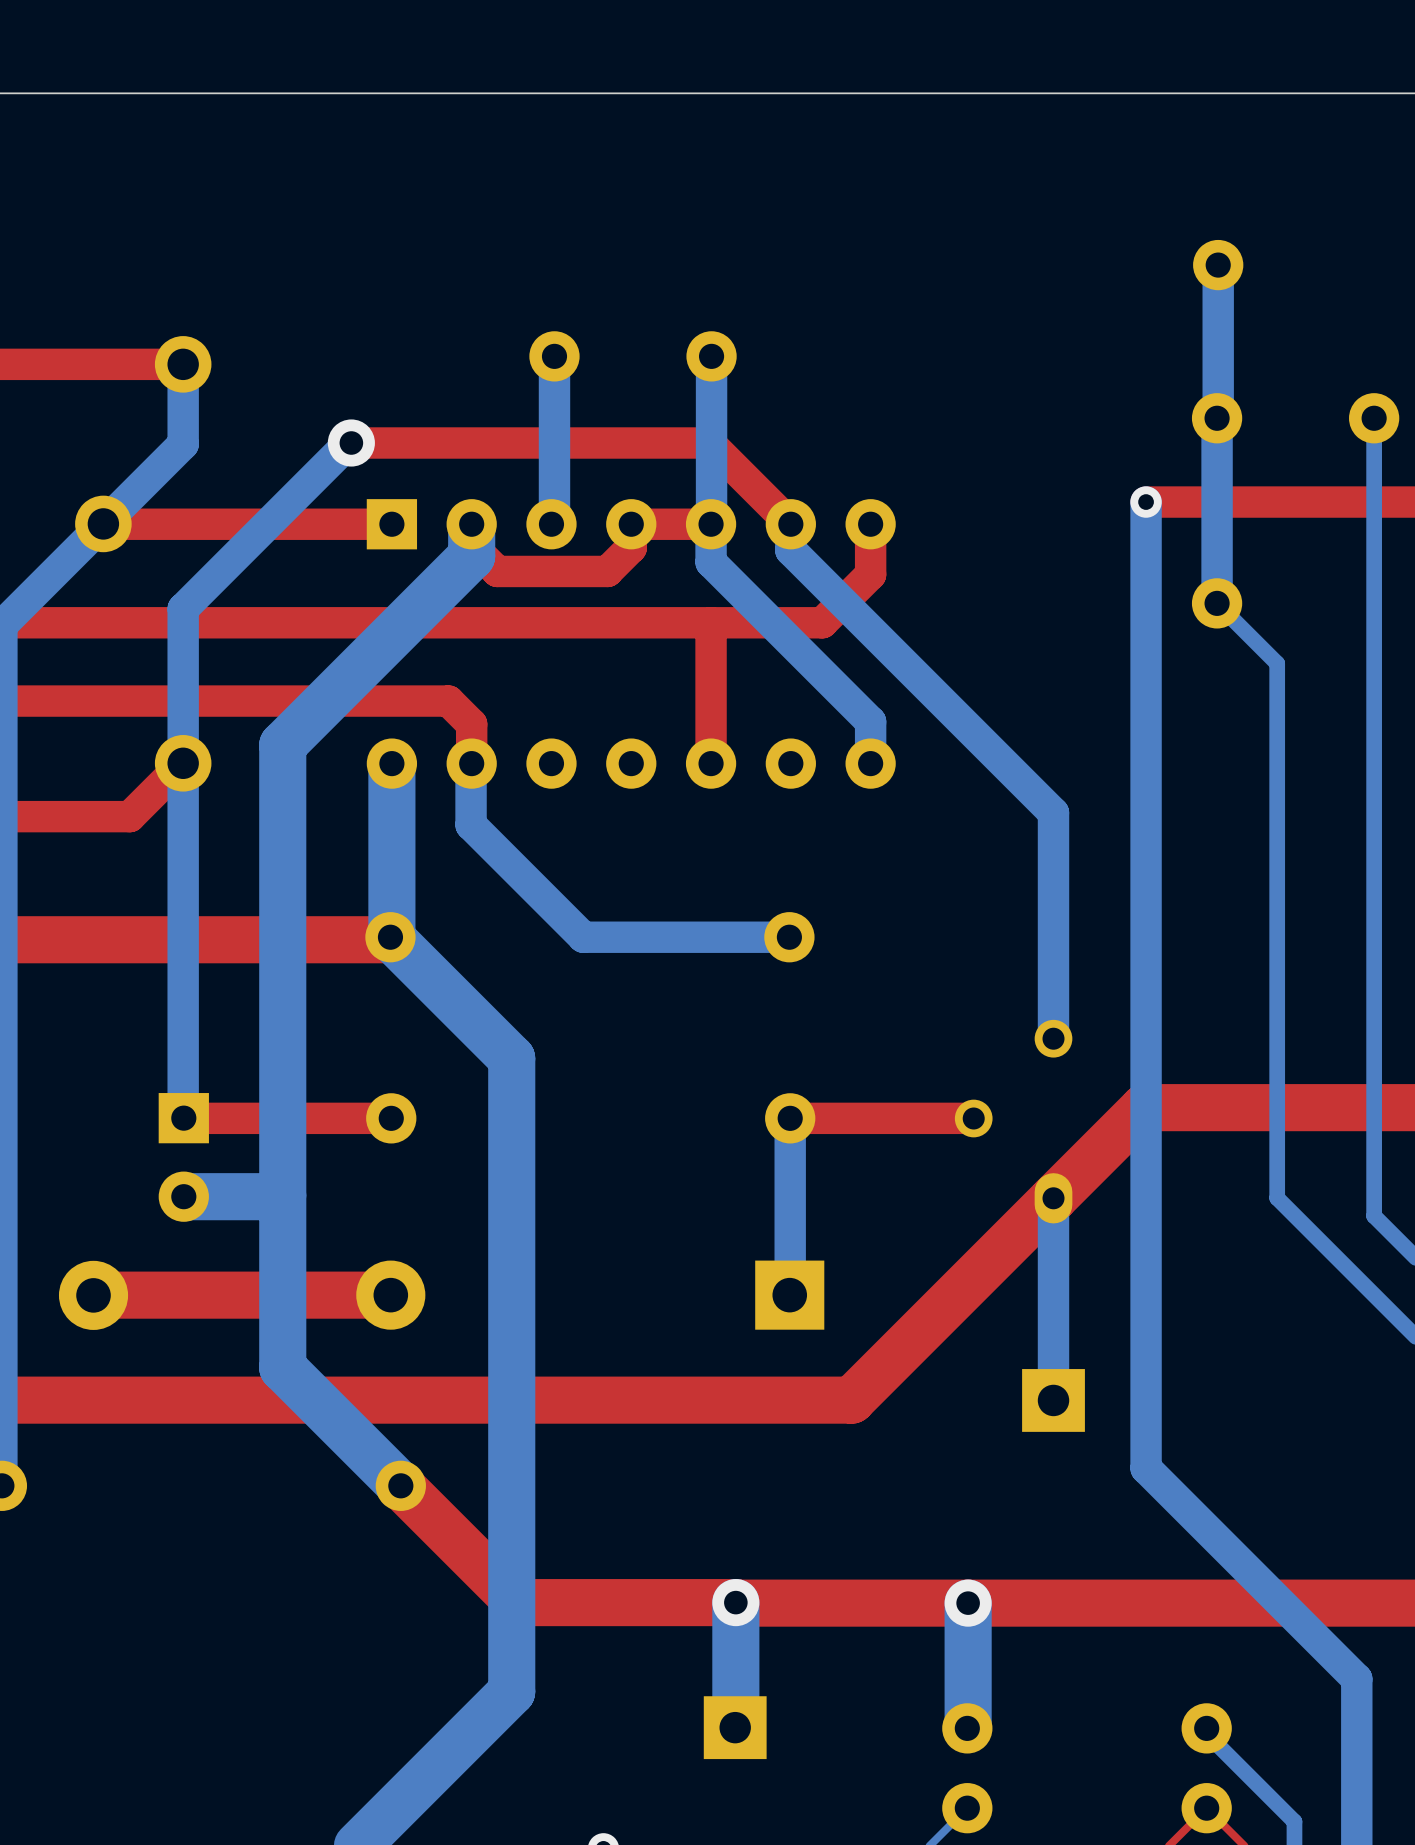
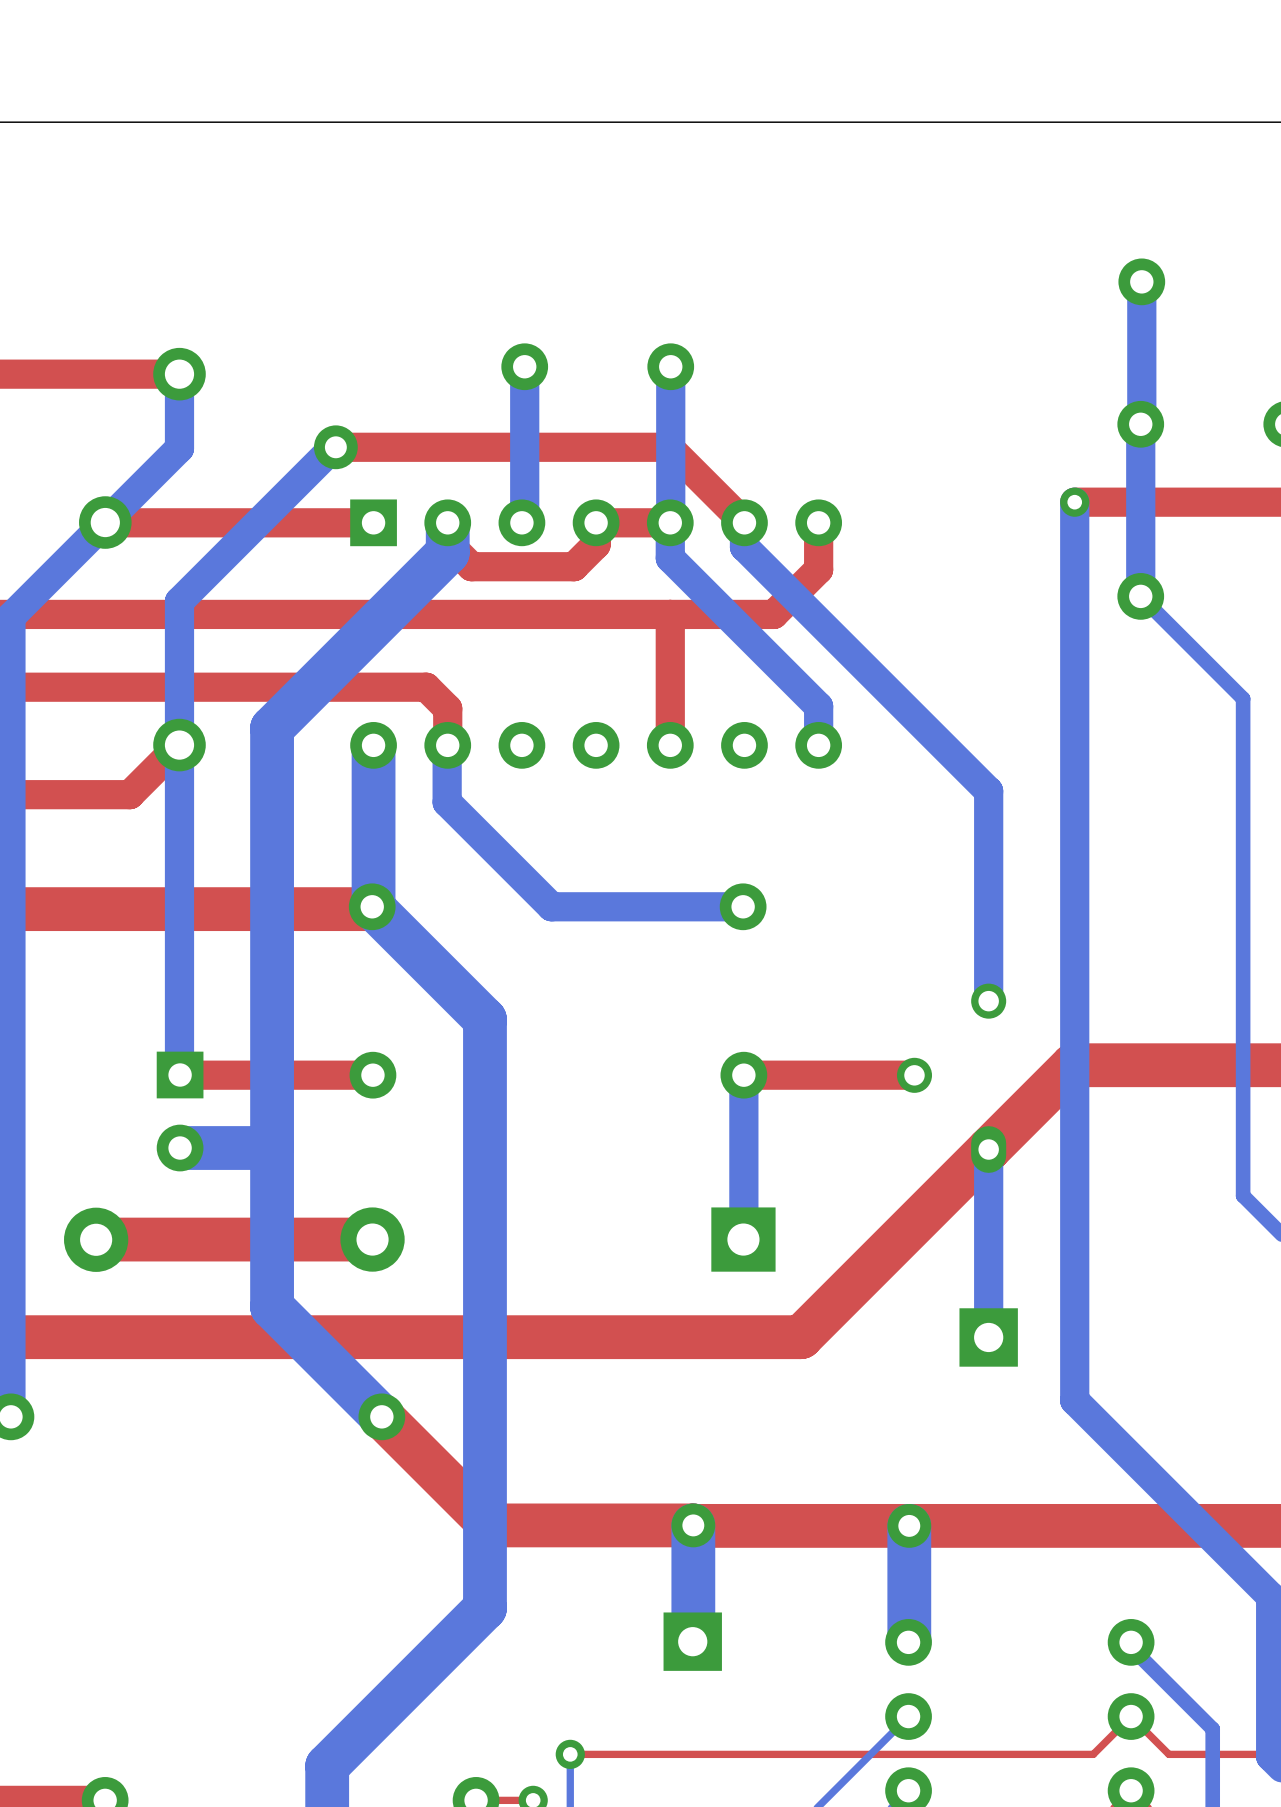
bottom track: (1277, 663) (1277, 1198) (1327, 1248) -> (1196, 652) (1243, 698) (1243, 1195)

